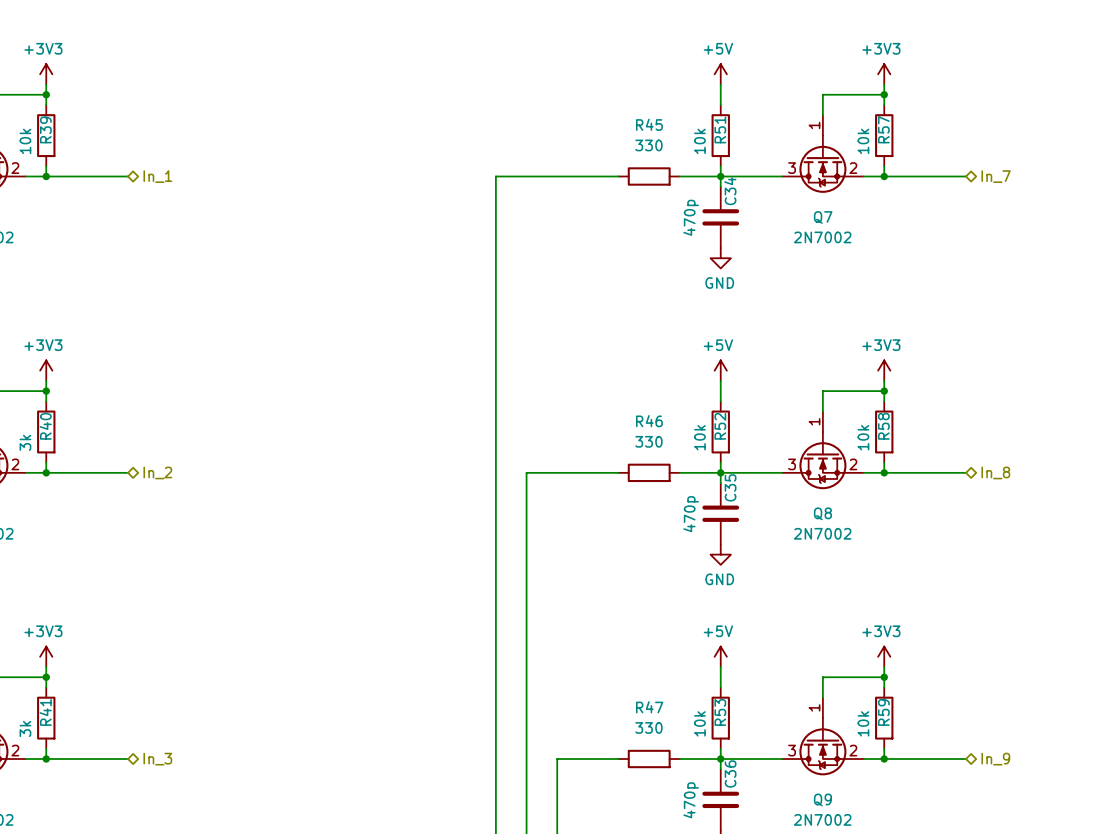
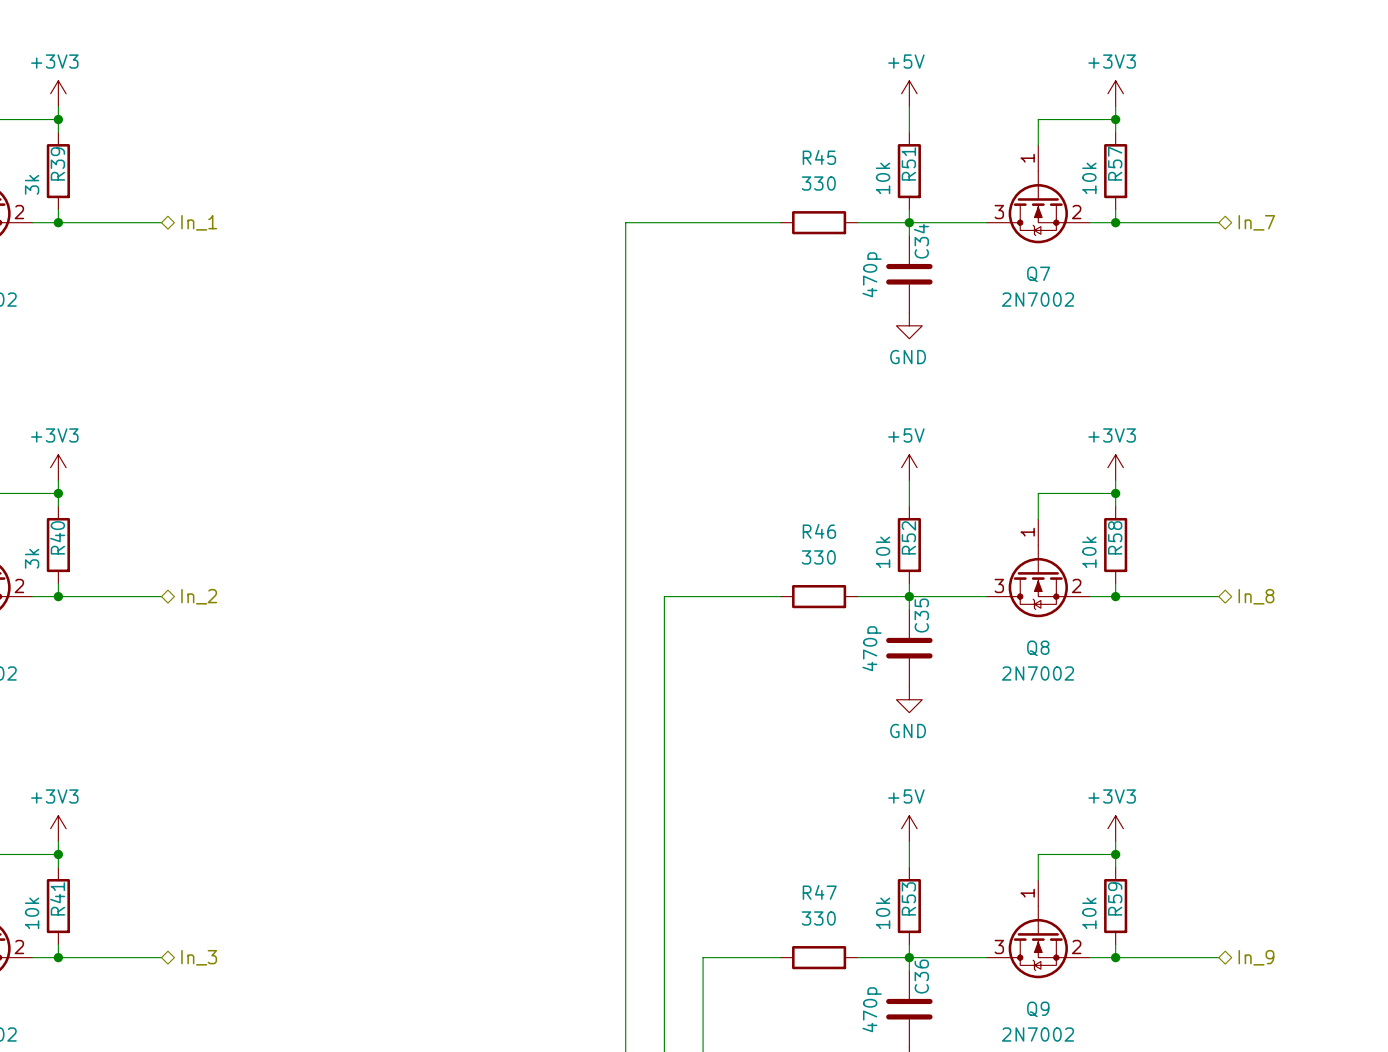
R39 value: 10k (25, 141) -> 3k (32, 184)
R41 value: 3k (25, 728) -> 10k (32, 913)

